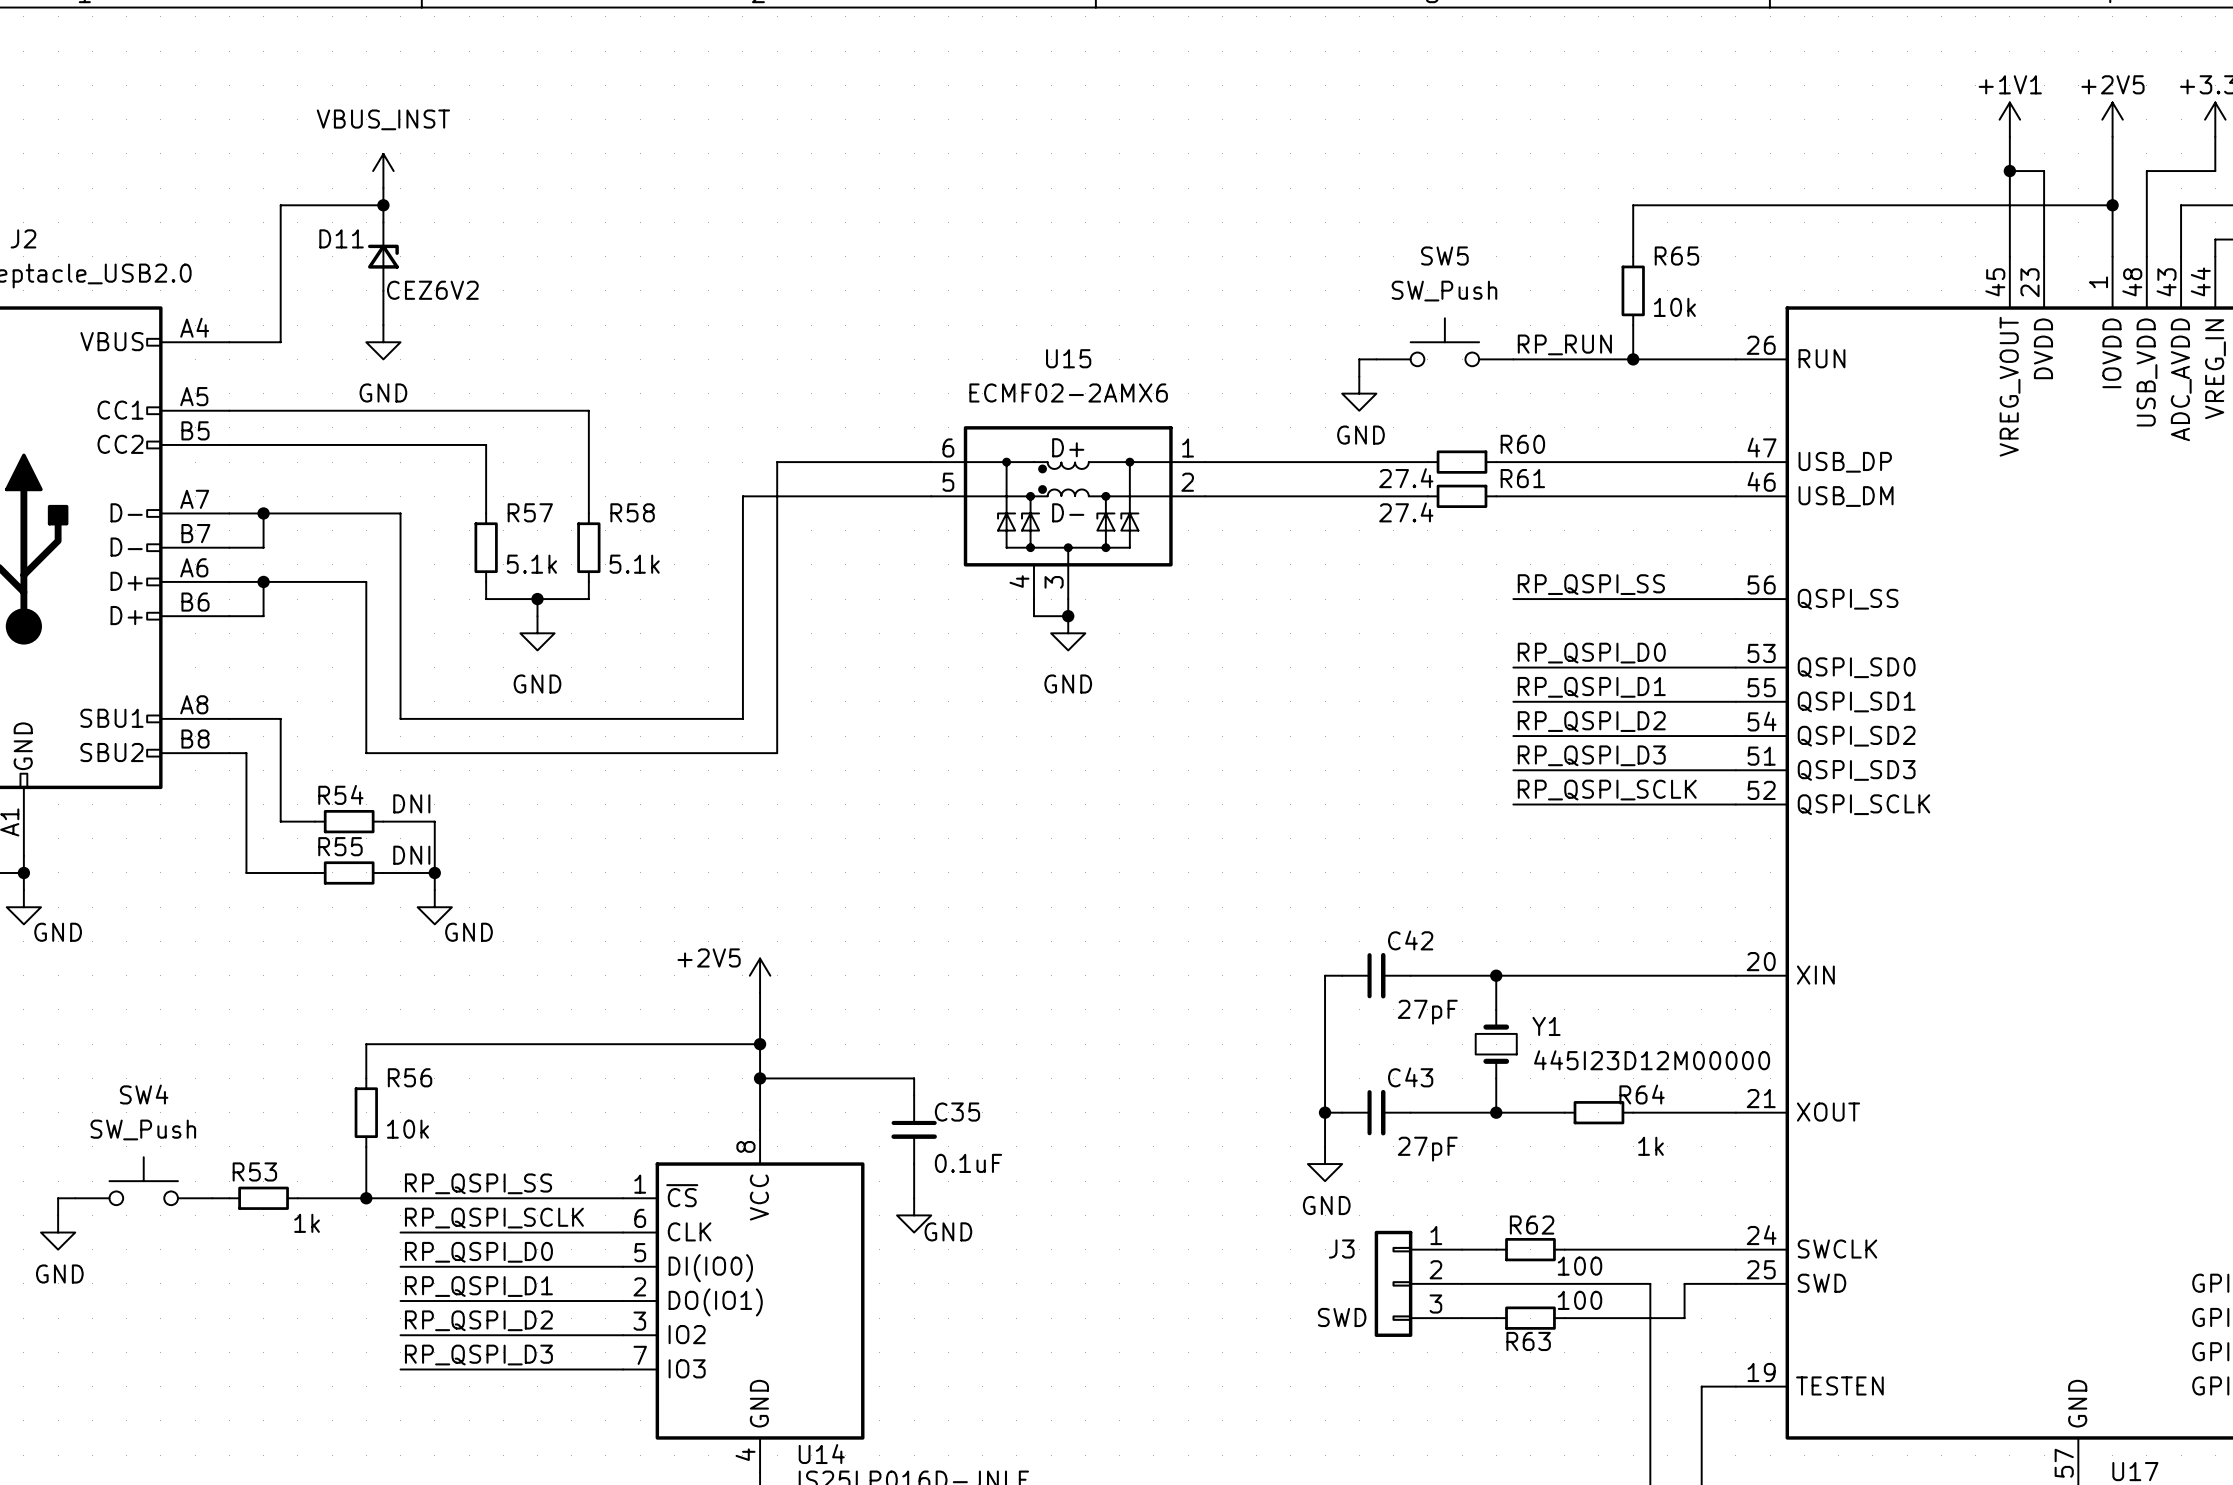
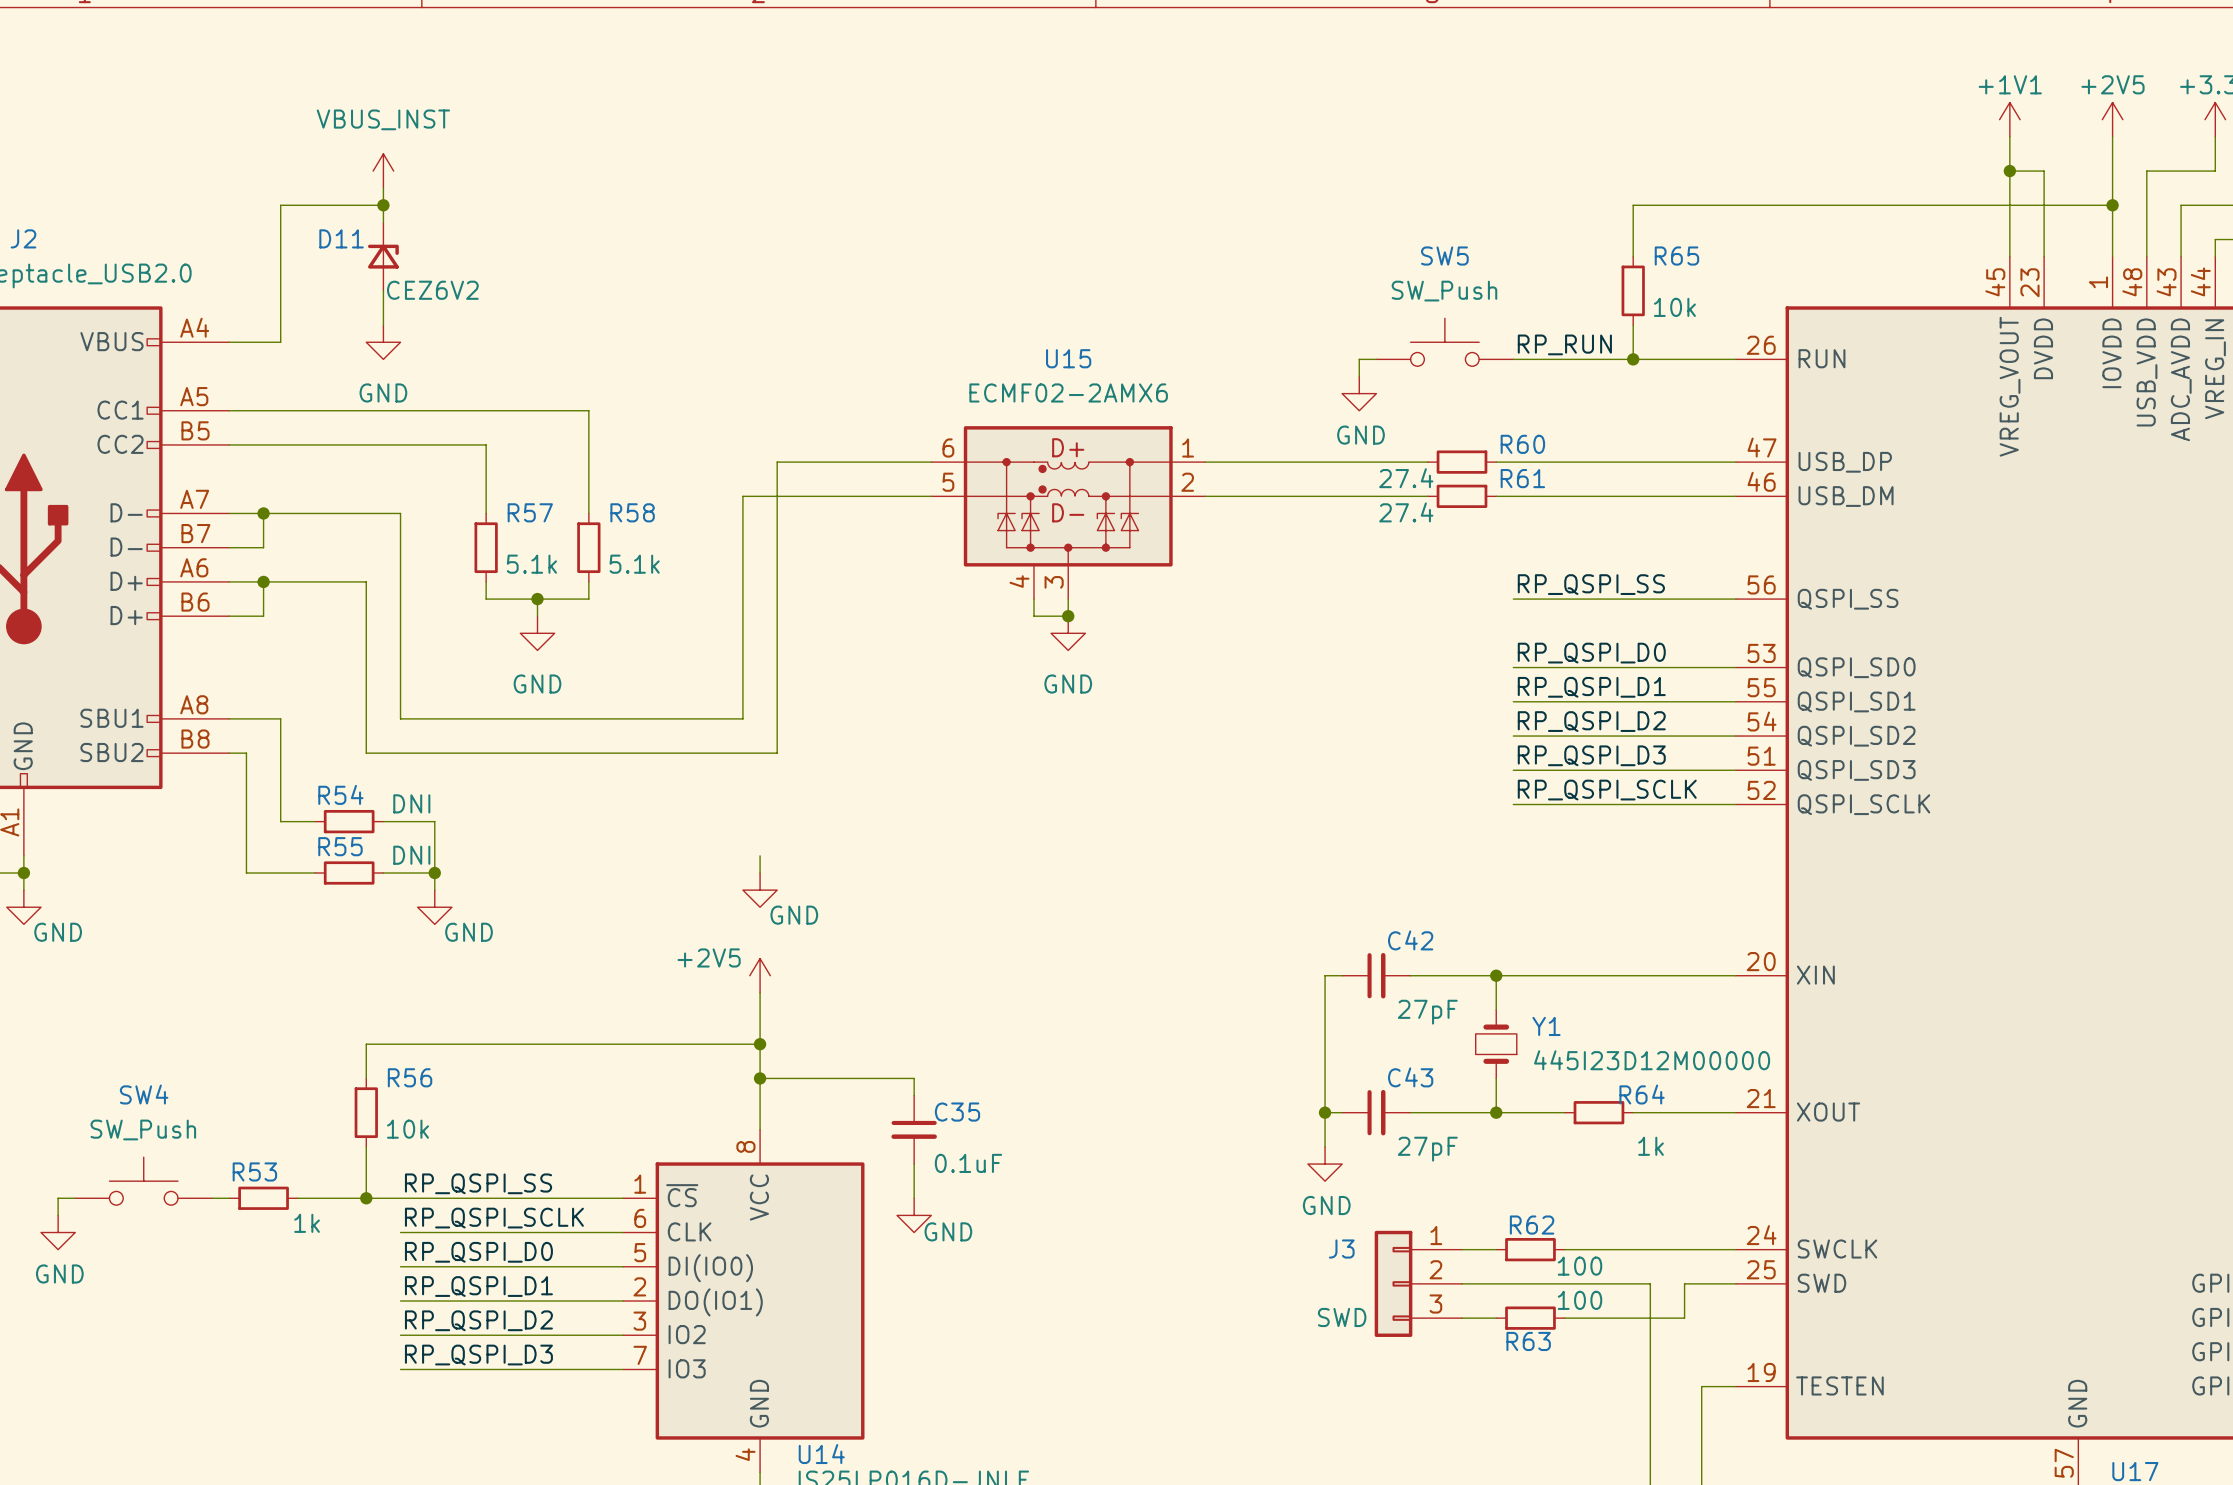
wire: none -> (760, 855) (760, 872)
power symbol: none -> GND (760, 890)

